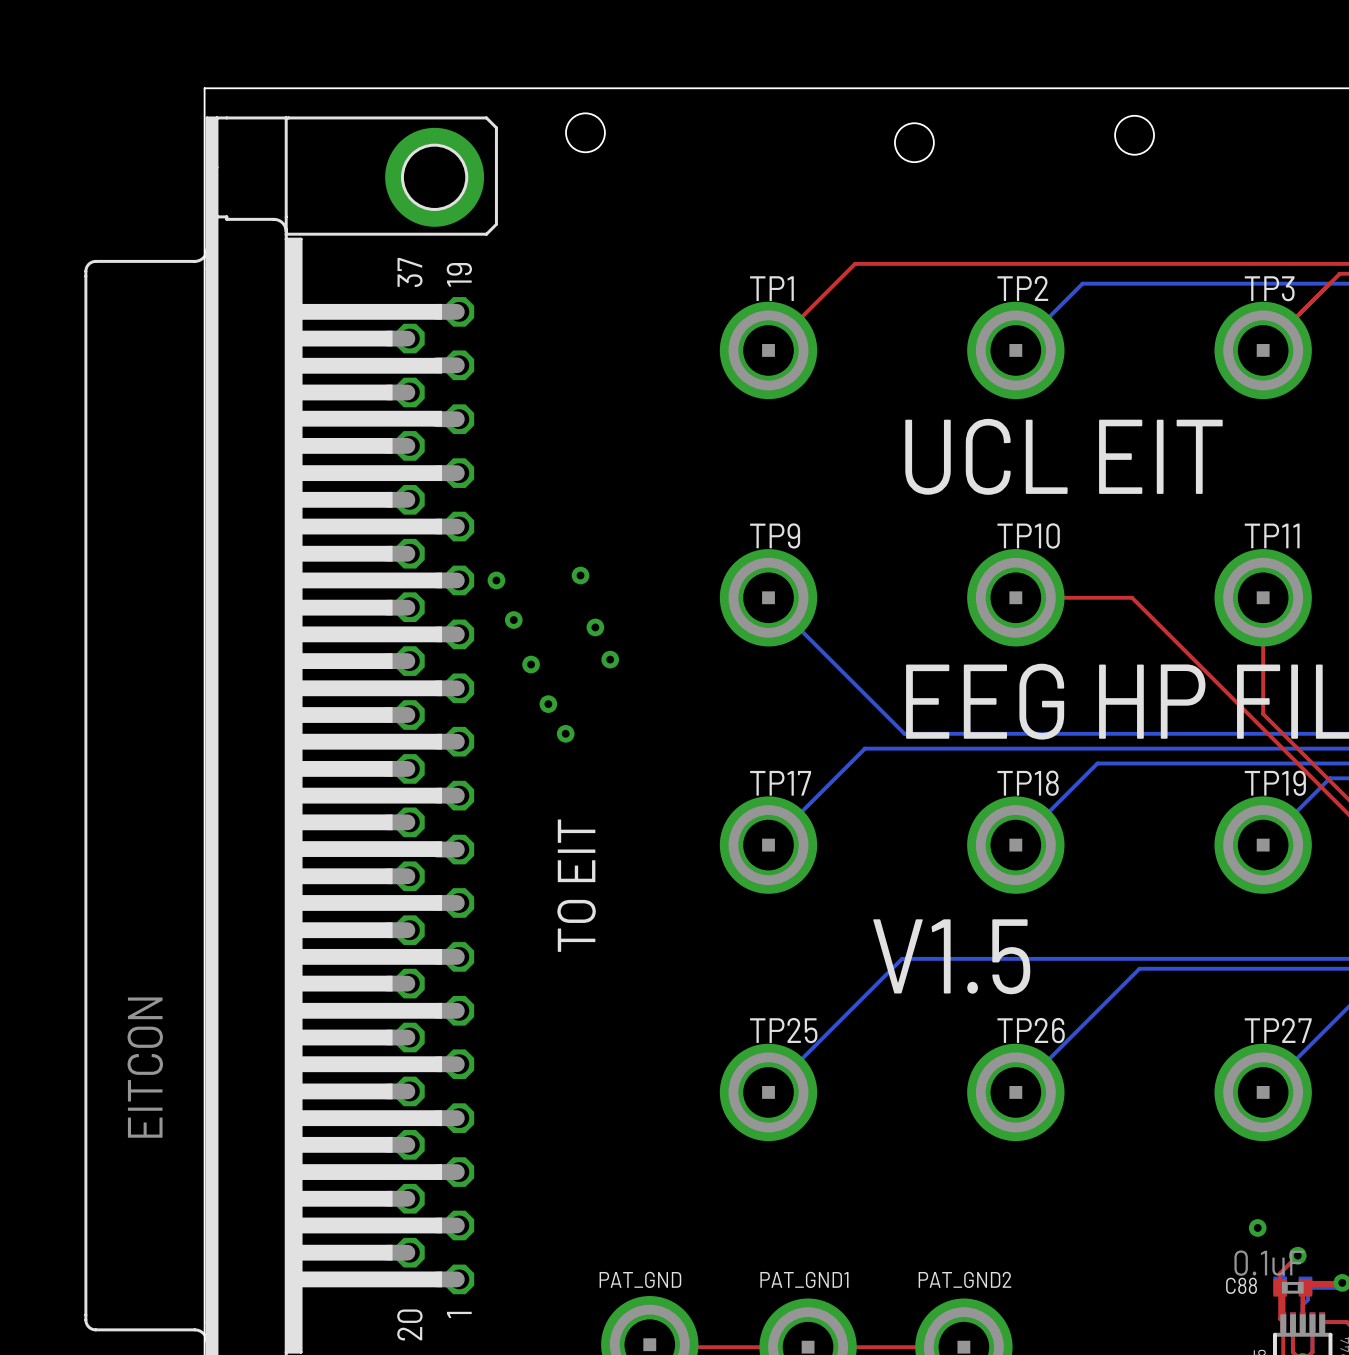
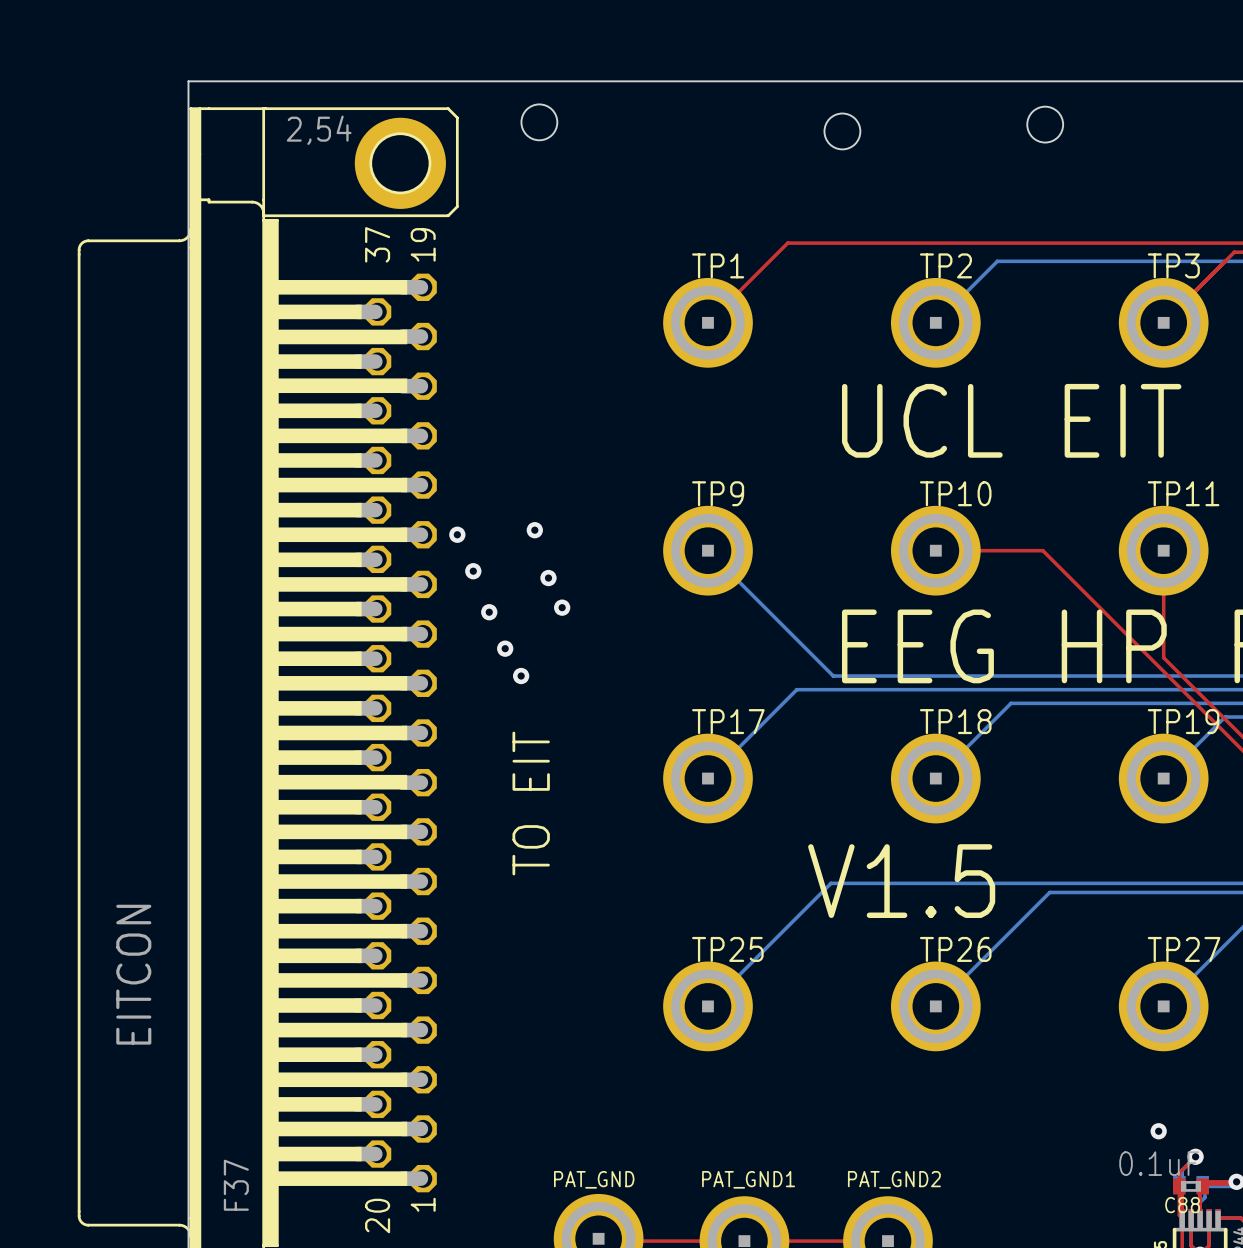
part text: none -> 2,54 (319, 130)
C88 name position: C88 (1241, 1285) -> C88 (1182, 1205)
part text: none -> F37 (236, 1185)

